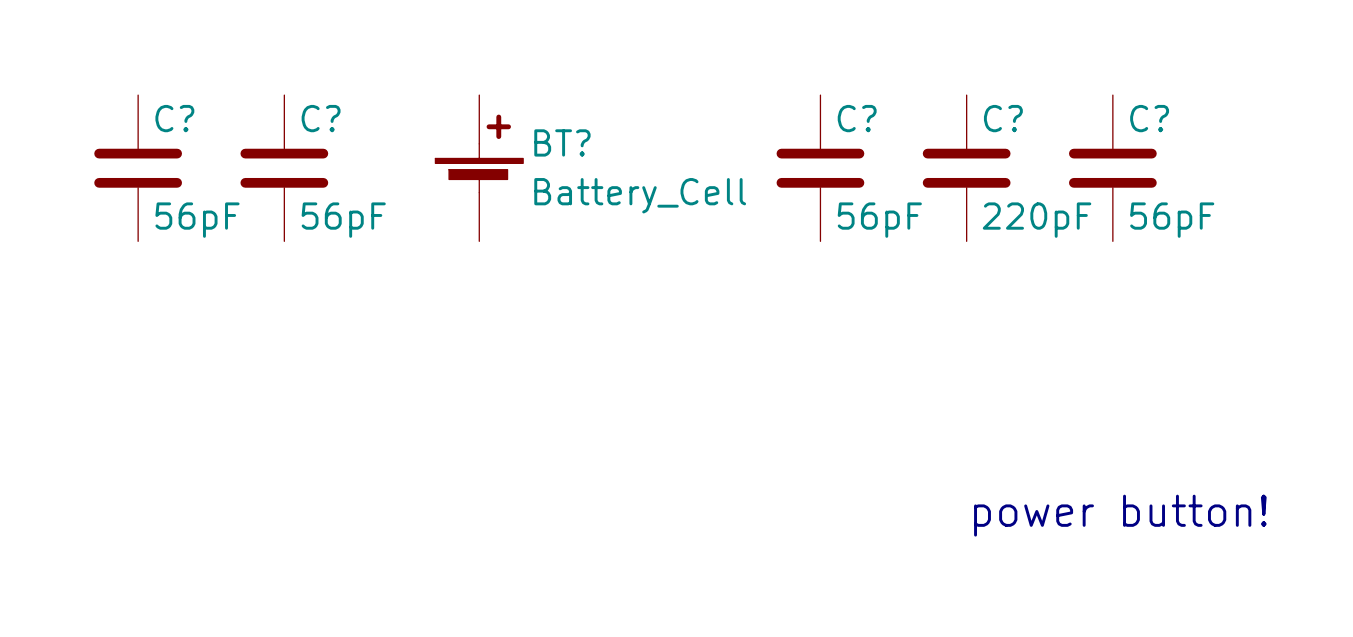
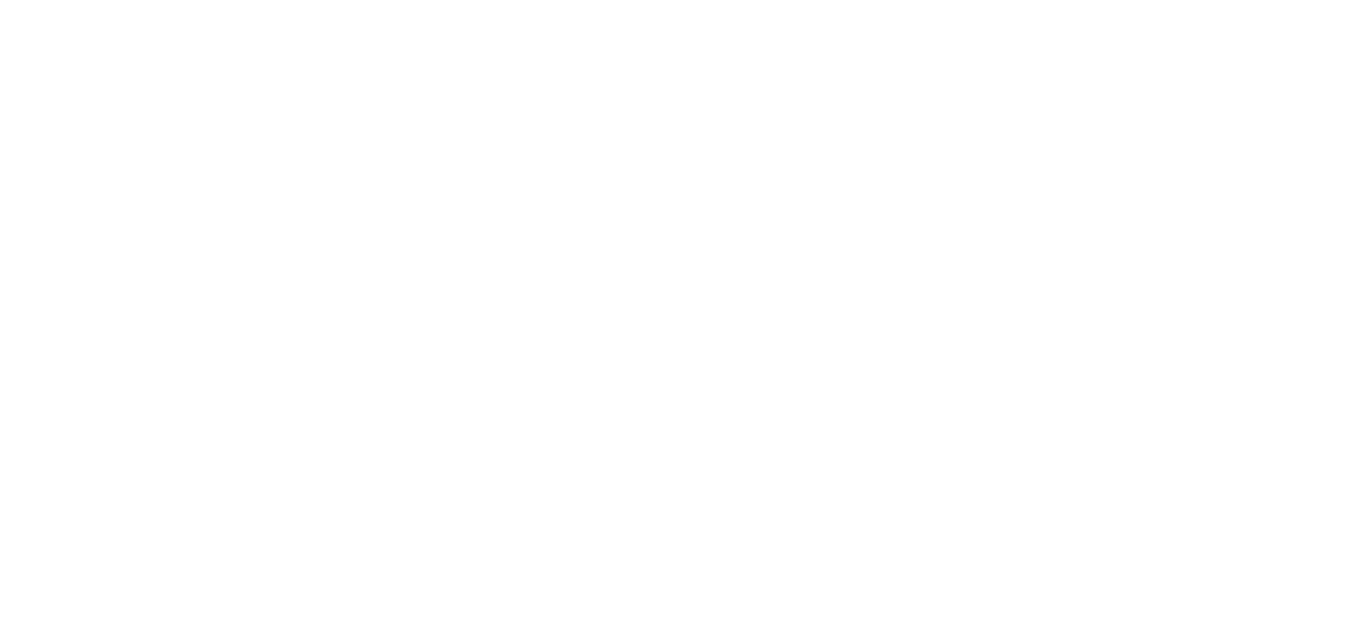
C?: 56pF (138, 168) -> none
C?: 56pF (284, 168) -> none
BT?: Battery_Cell (479, 168) -> none
C?: 56pF (820, 168) -> none
C?: 220pF (966, 168) -> none
C?: 56pF (1112, 168) -> none
text: power button! (1120, 515) -> none

